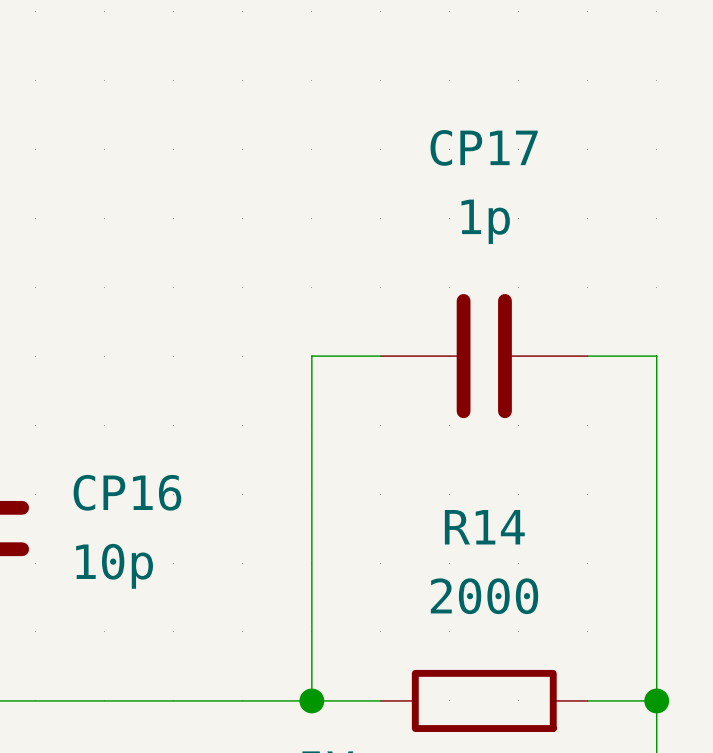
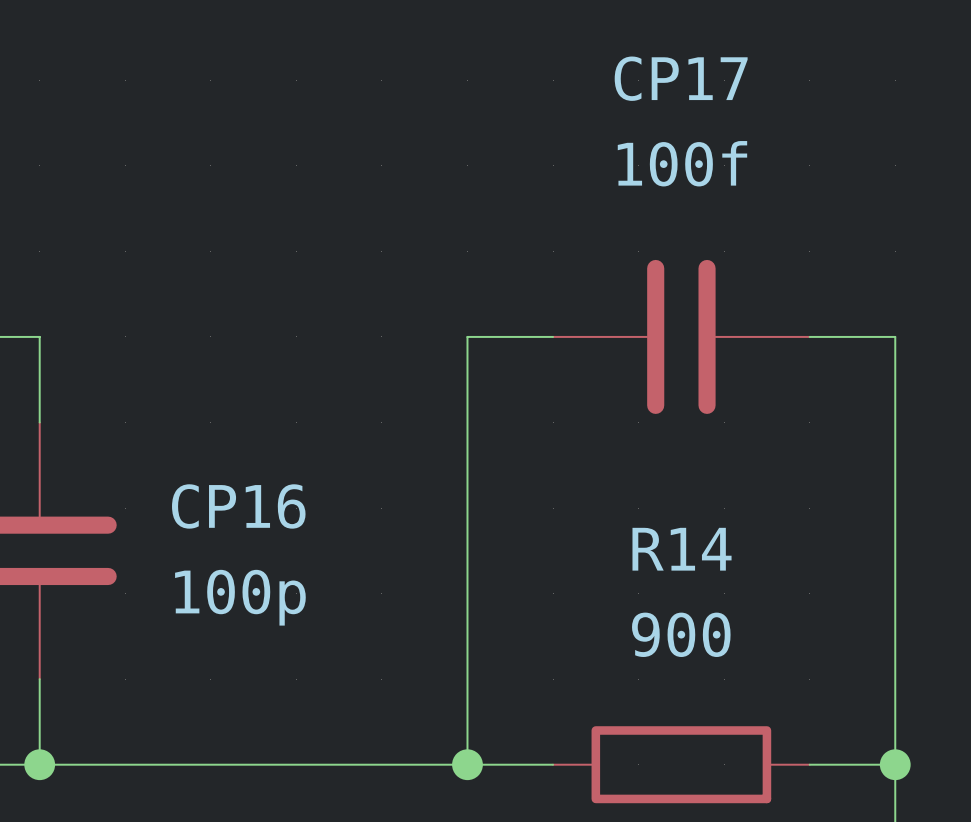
CP17 value: 1p (485, 221) -> 100f (682, 163)
CP16 value: 10p (114, 566) -> 100p (240, 597)
R14 value: 2000 (484, 596) -> 900 (681, 634)

